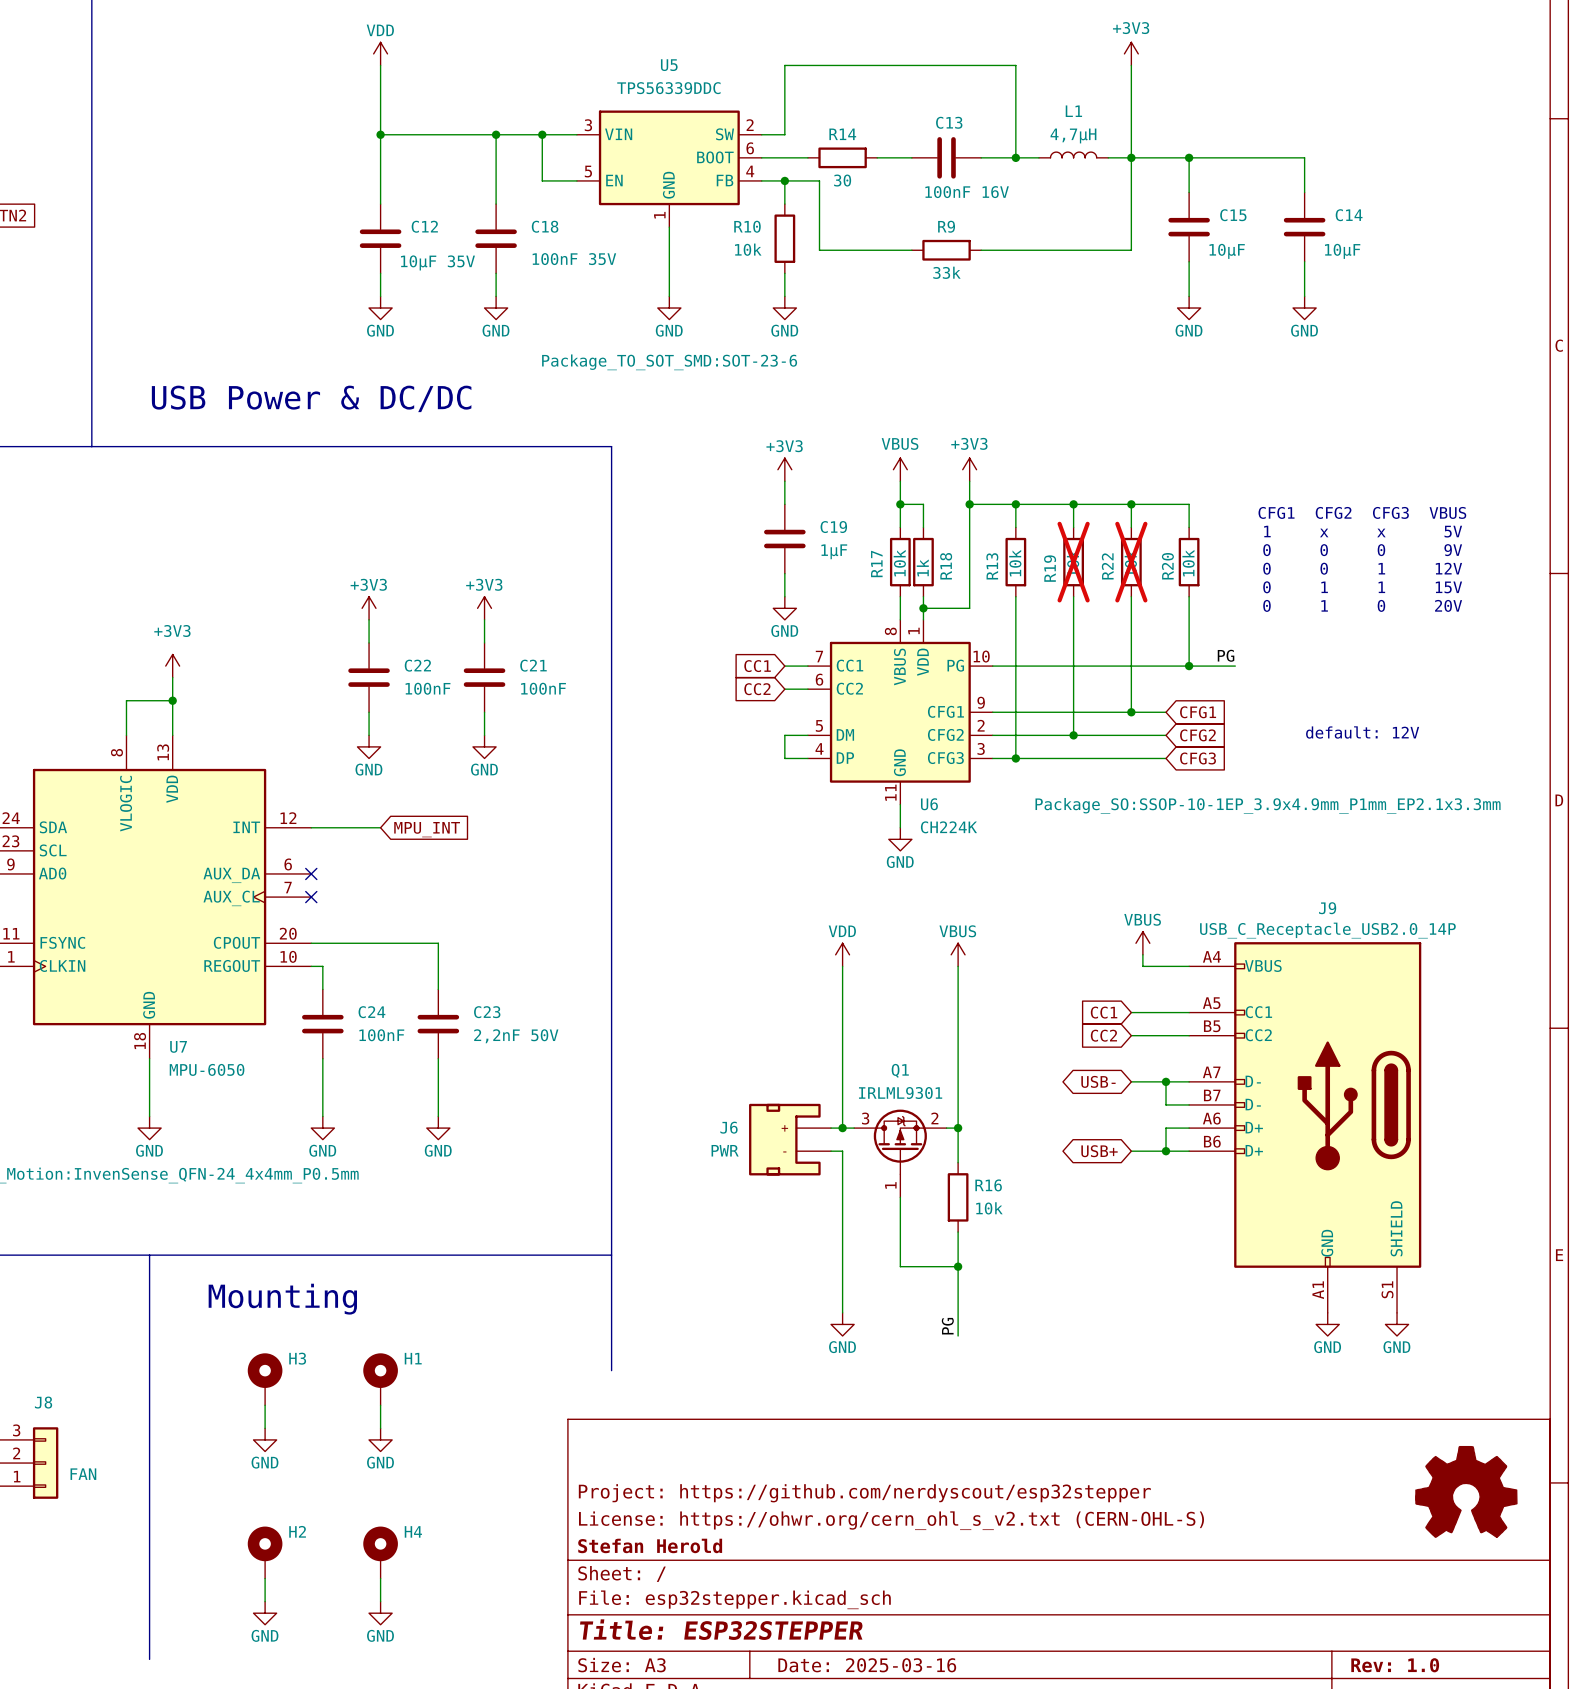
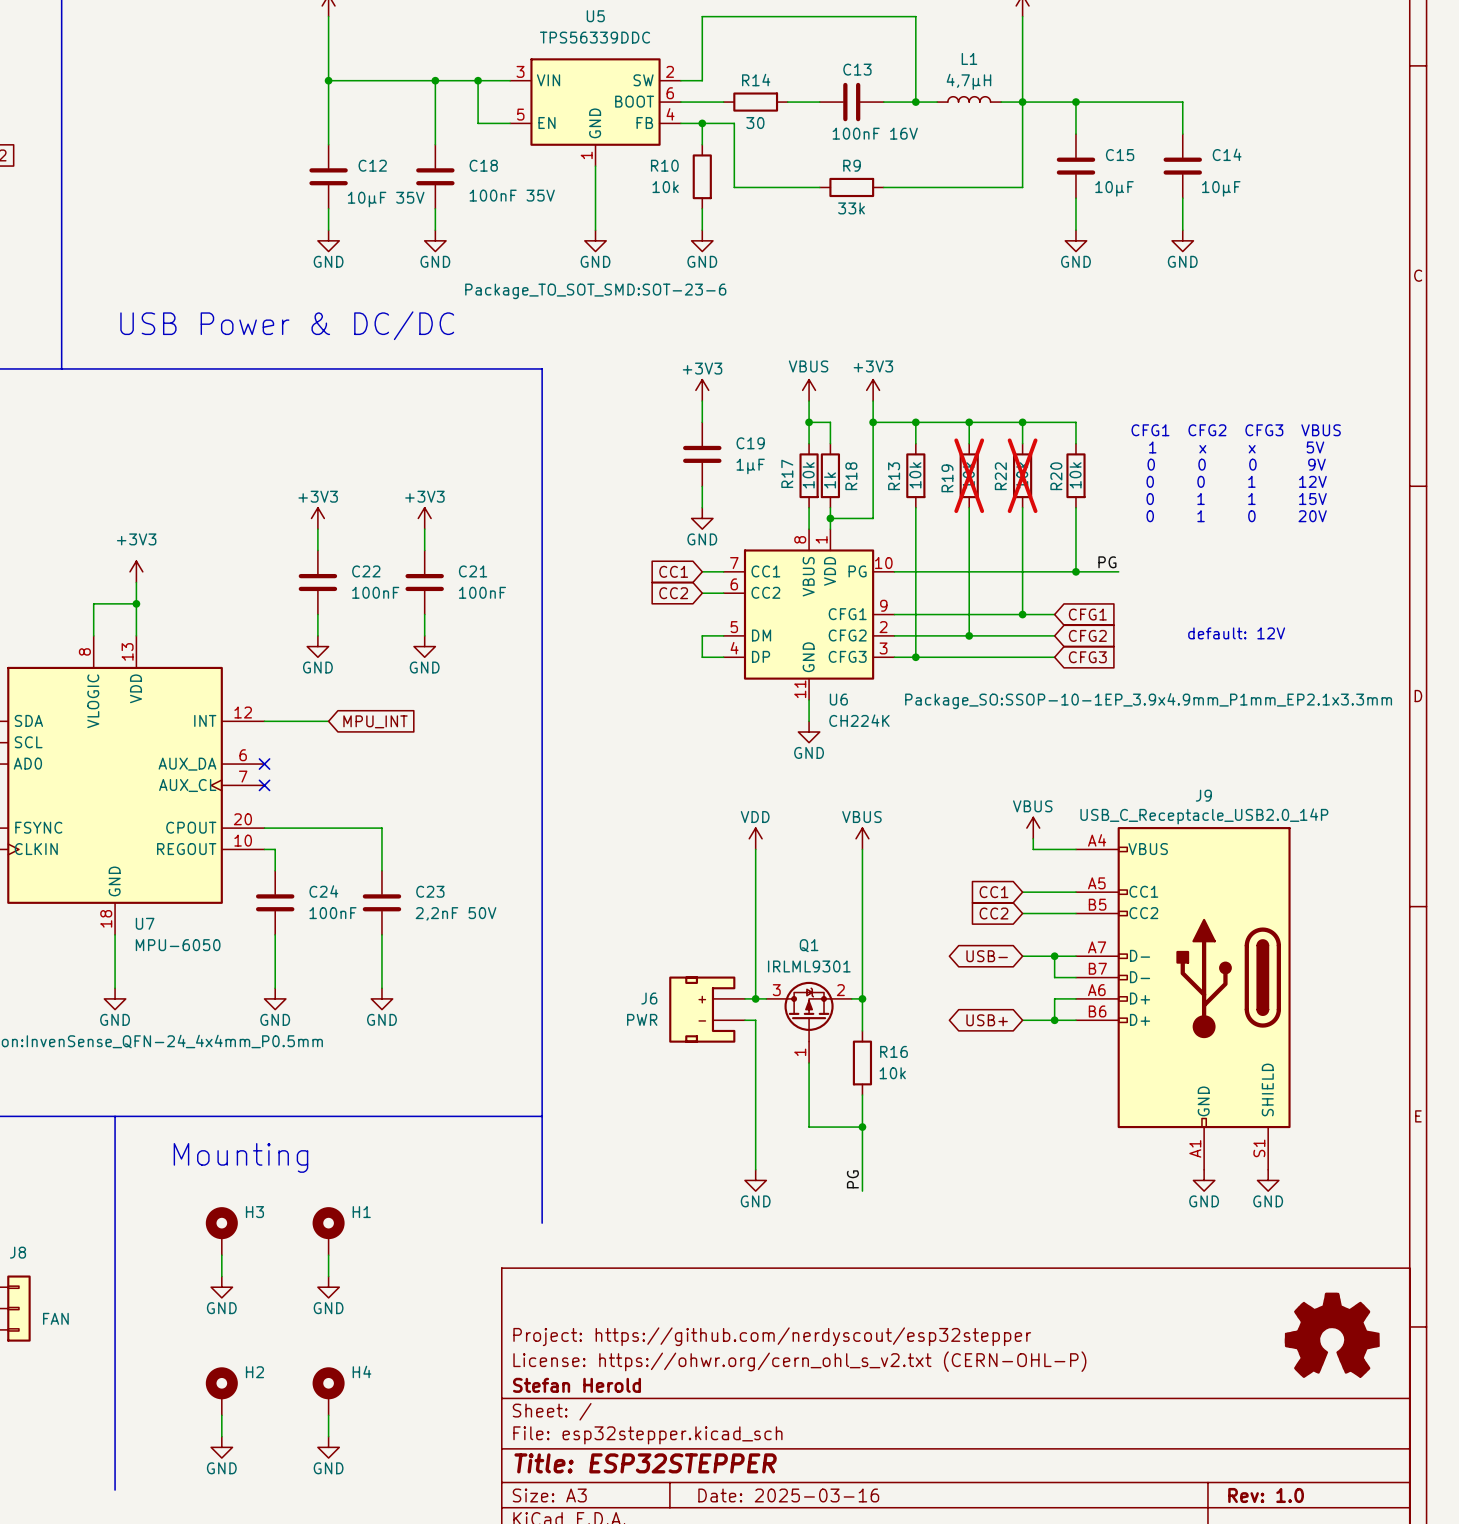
title block: License: https://ohwr.org/cern_ohl_s_v2.txt (CERN-OHL-S) (891, 1520) -> License: https://ohwr.org/cern_ohl_s_v2.txt (CERN-OHL-P) (799, 1361)

